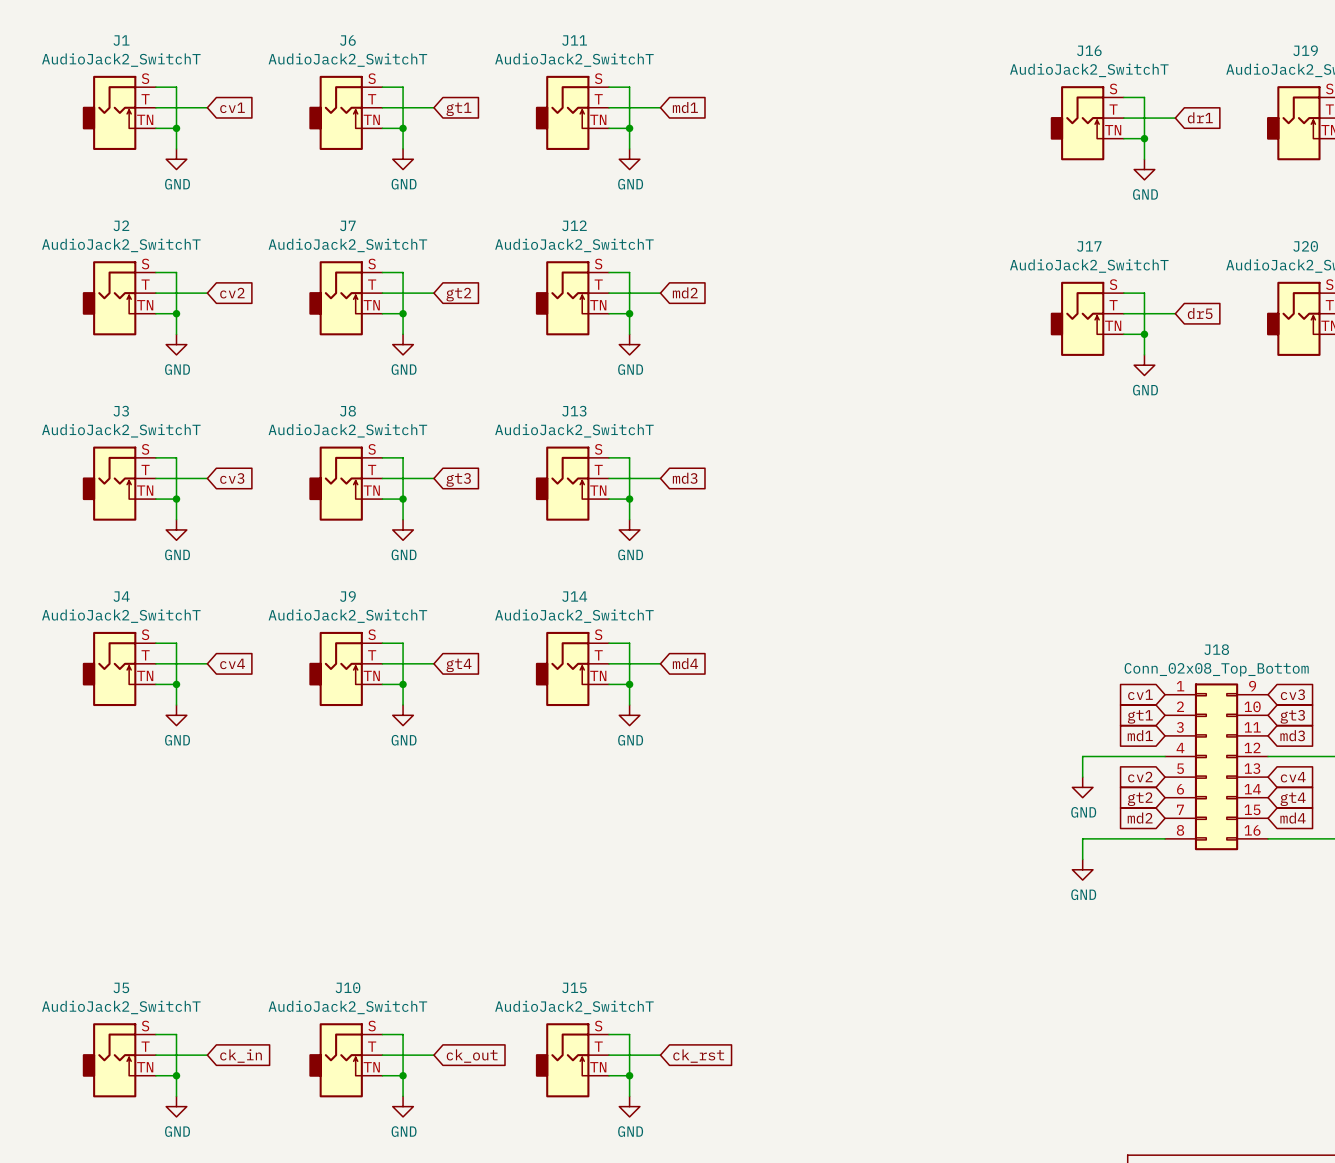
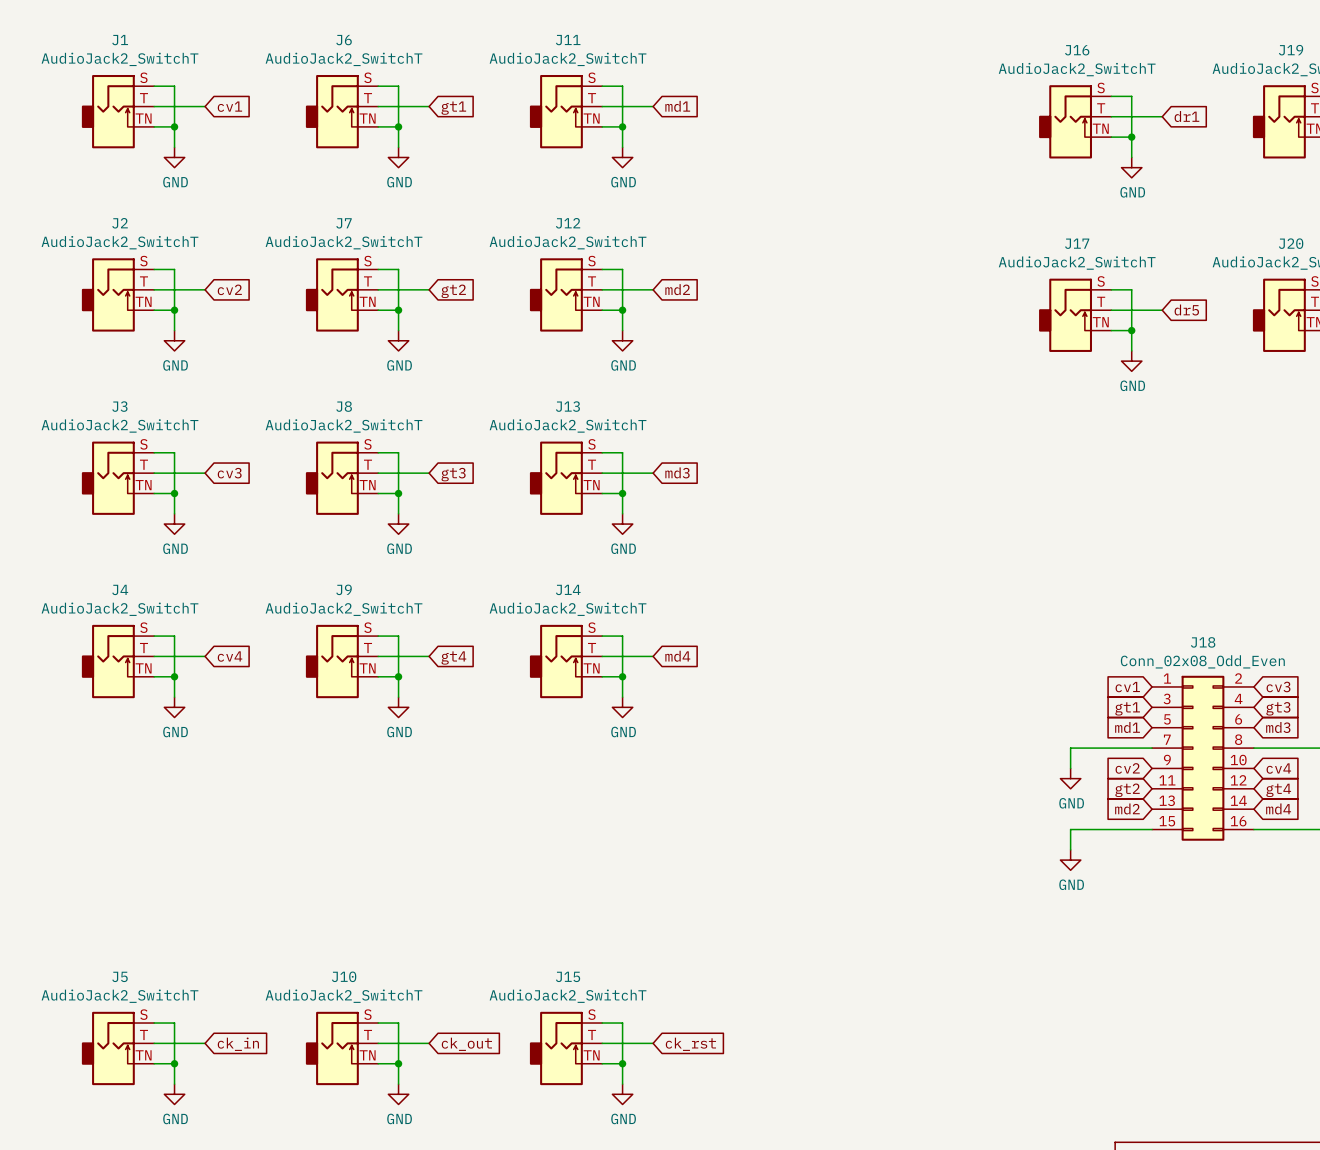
J18 value: Conn_02x08_Top_Bottom (1216, 669) -> Conn_02x08_Odd_Even (1202, 661)
J18 symbol: [1165, 683, 1269, 851] -> [1152, 675, 1254, 841]

